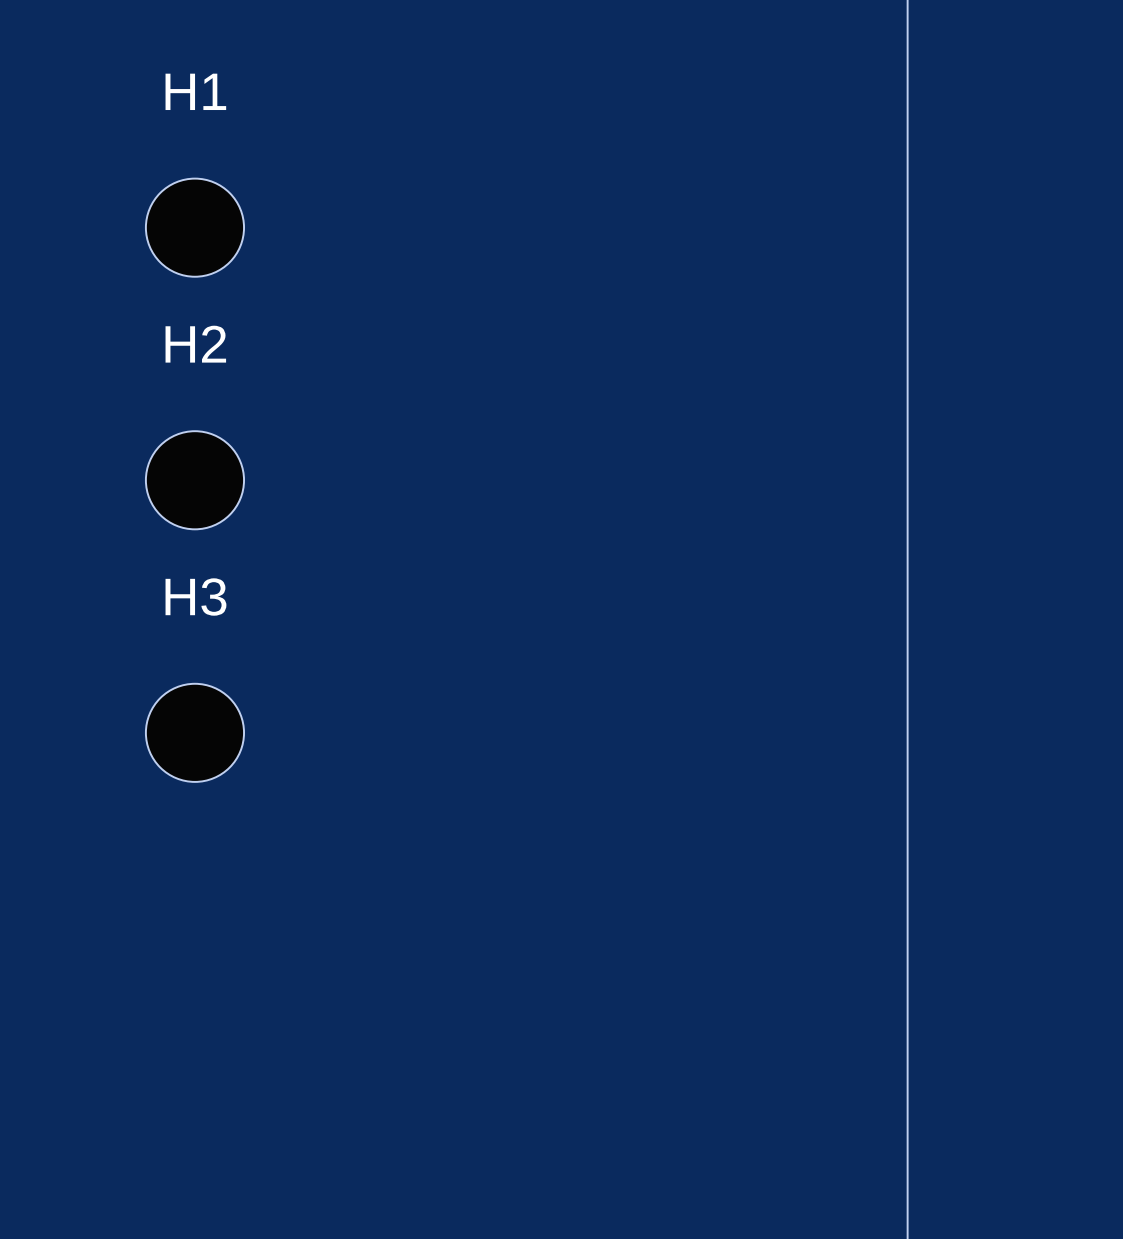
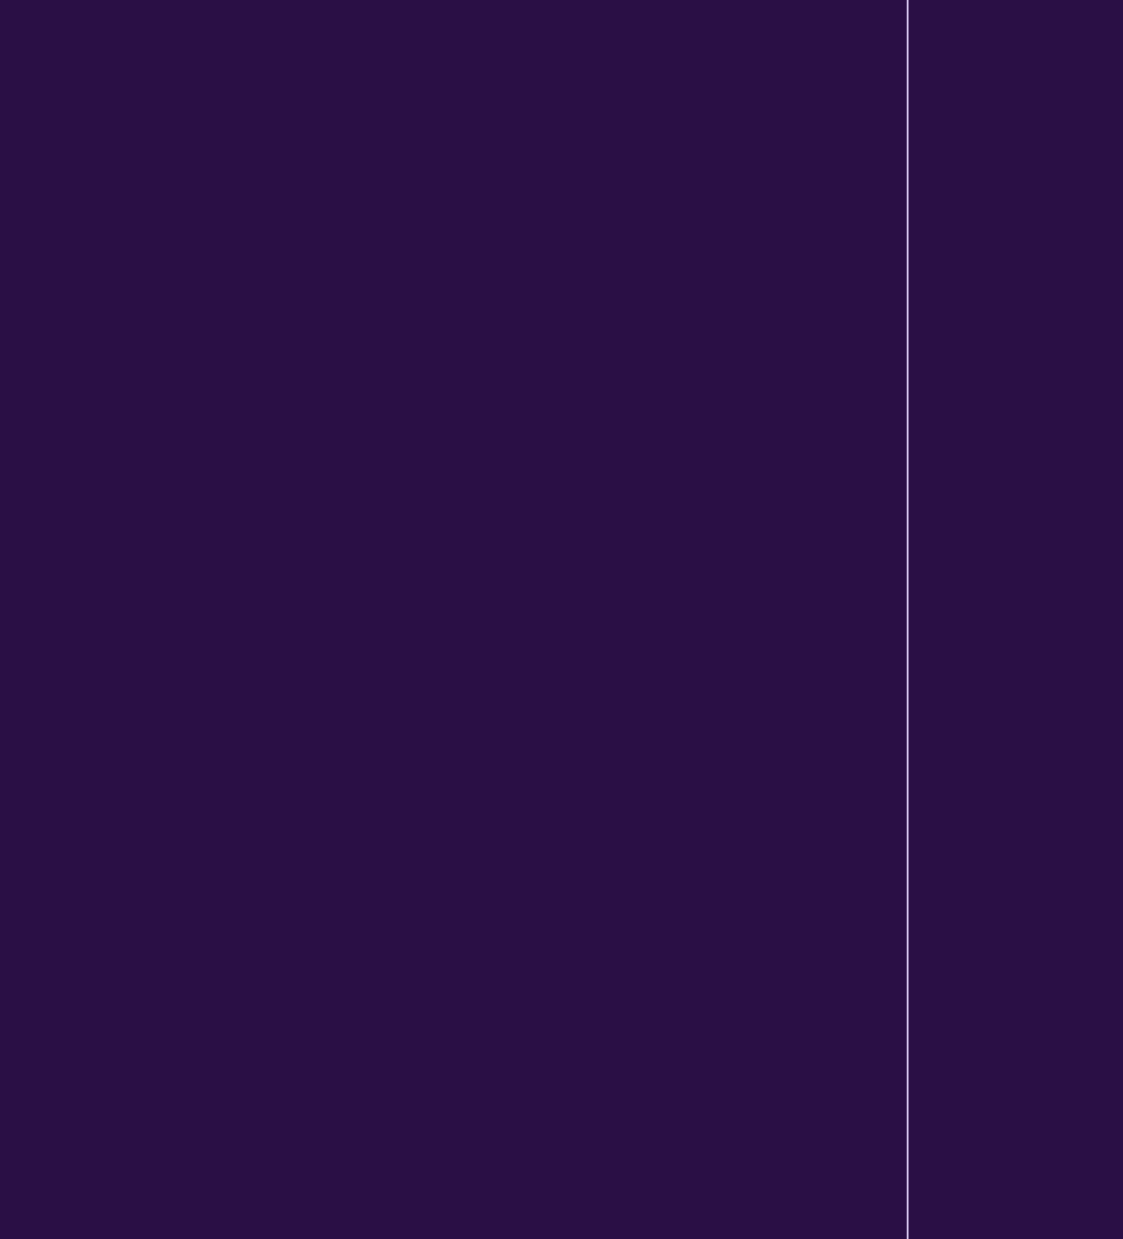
H1: (194, 227) -> none
H2: (194, 480) -> none
H3: (194, 732) -> none

